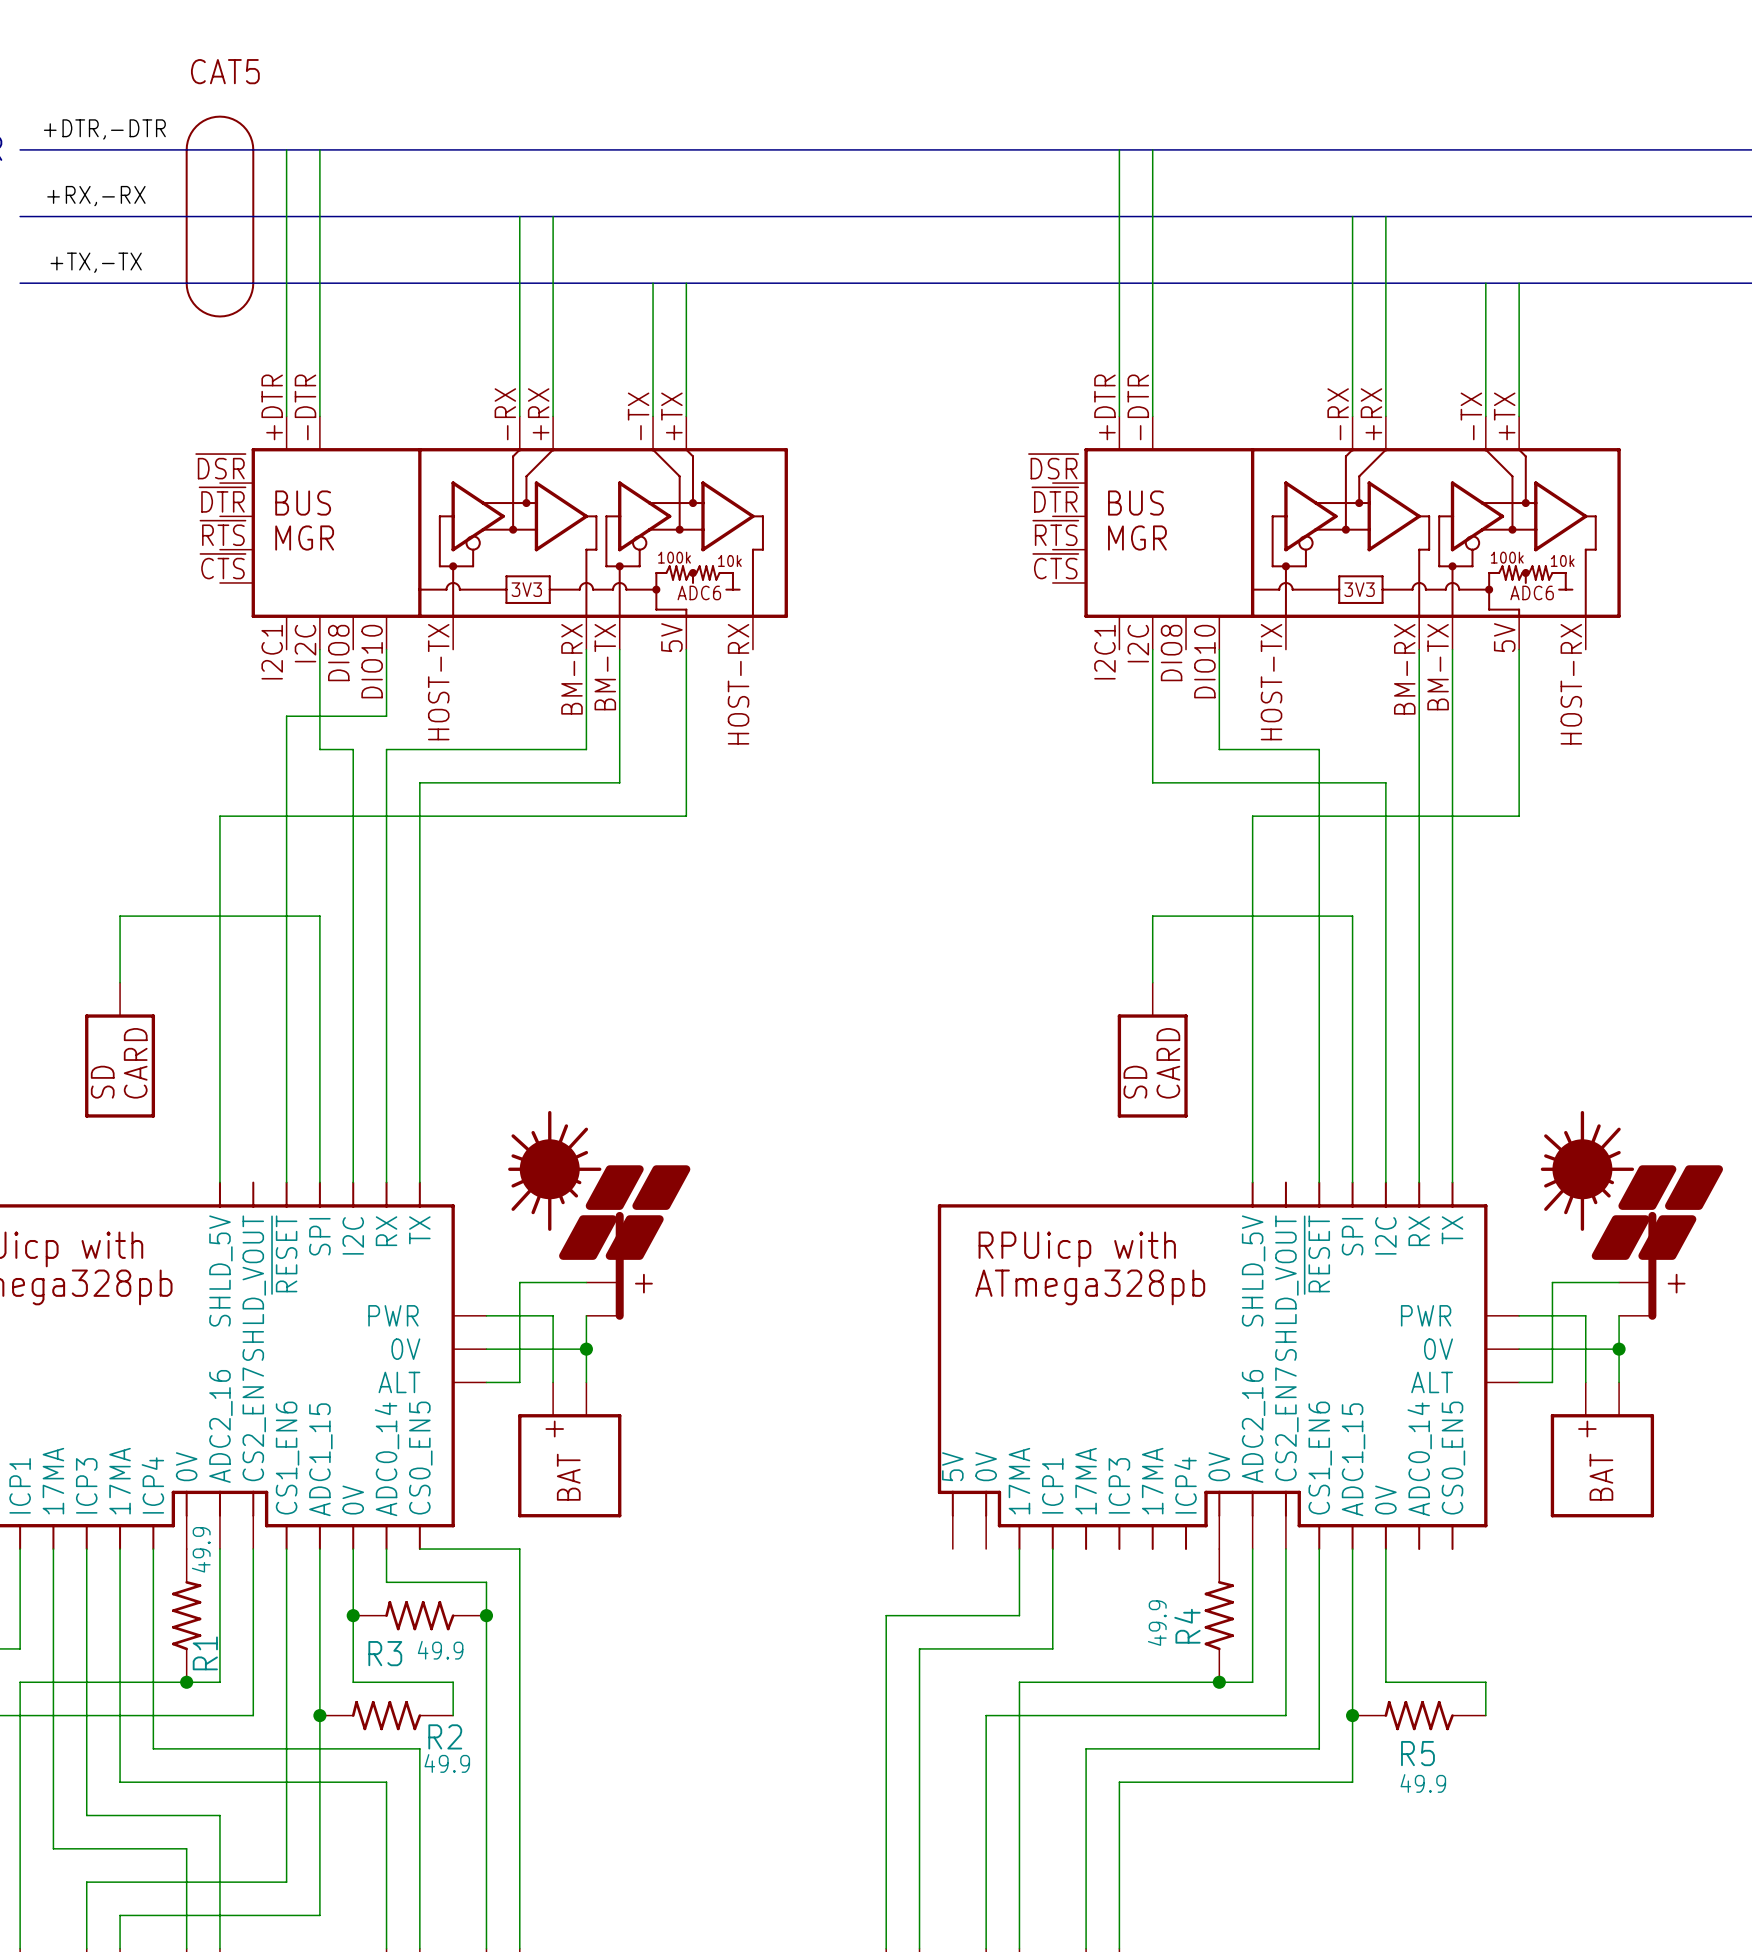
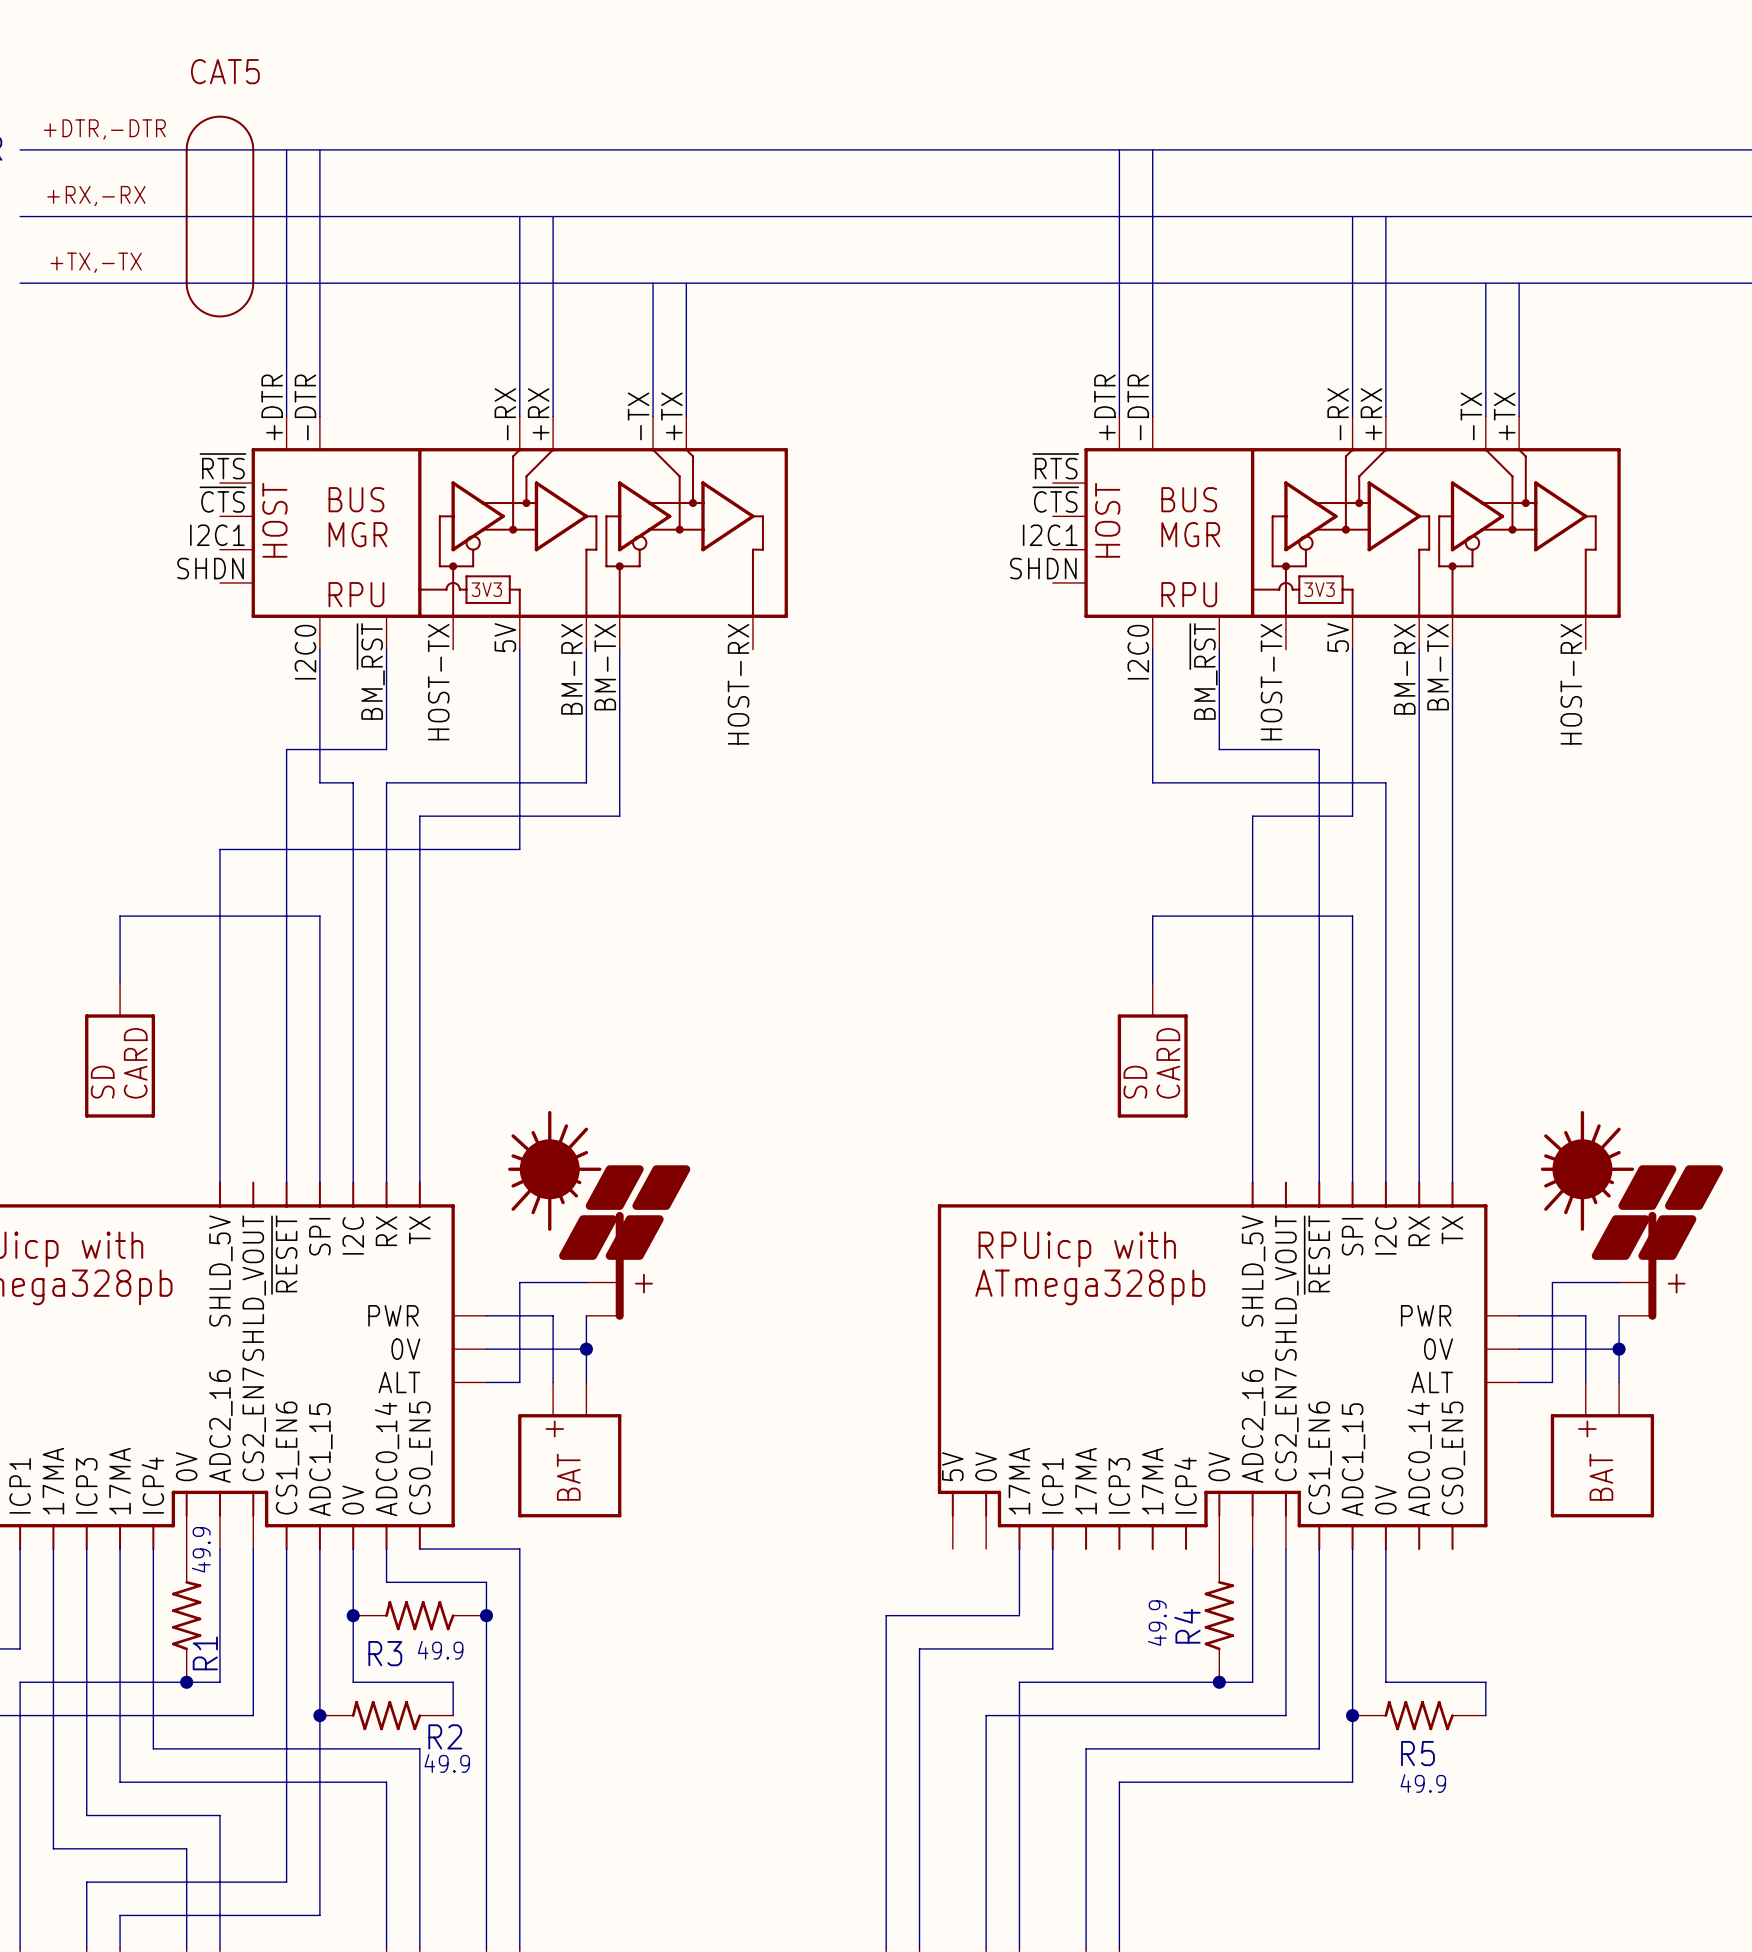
part symbol: [219, 416, 788, 650] -> [219, 416, 788, 650]
part symbol: [1052, 416, 1621, 650] -> [1052, 416, 1621, 650]
wire: (686, 649) (686, 816) (619, 816) -> (619, 782) (619, 816)
wire: (1519, 649) (1519, 816) (1352, 816) -> (1352, 649) (1352, 816)
wire: (386, 716) (286, 716) (286, 749) -> (386, 716) (386, 749) (353, 749)
wire: (353, 749) (353, 782) -> (286, 749) (319, 749) (319, 782) (353, 782)
wire: (586, 749) (386, 749) (386, 782) -> (419, 782) (386, 782)
wire: (419, 782) (419, 816) (219, 816) (219, 849) -> (519, 649) (519, 849) (219, 849)
wire: (586, 782) (619, 782) -> (586, 782) (586, 749)

